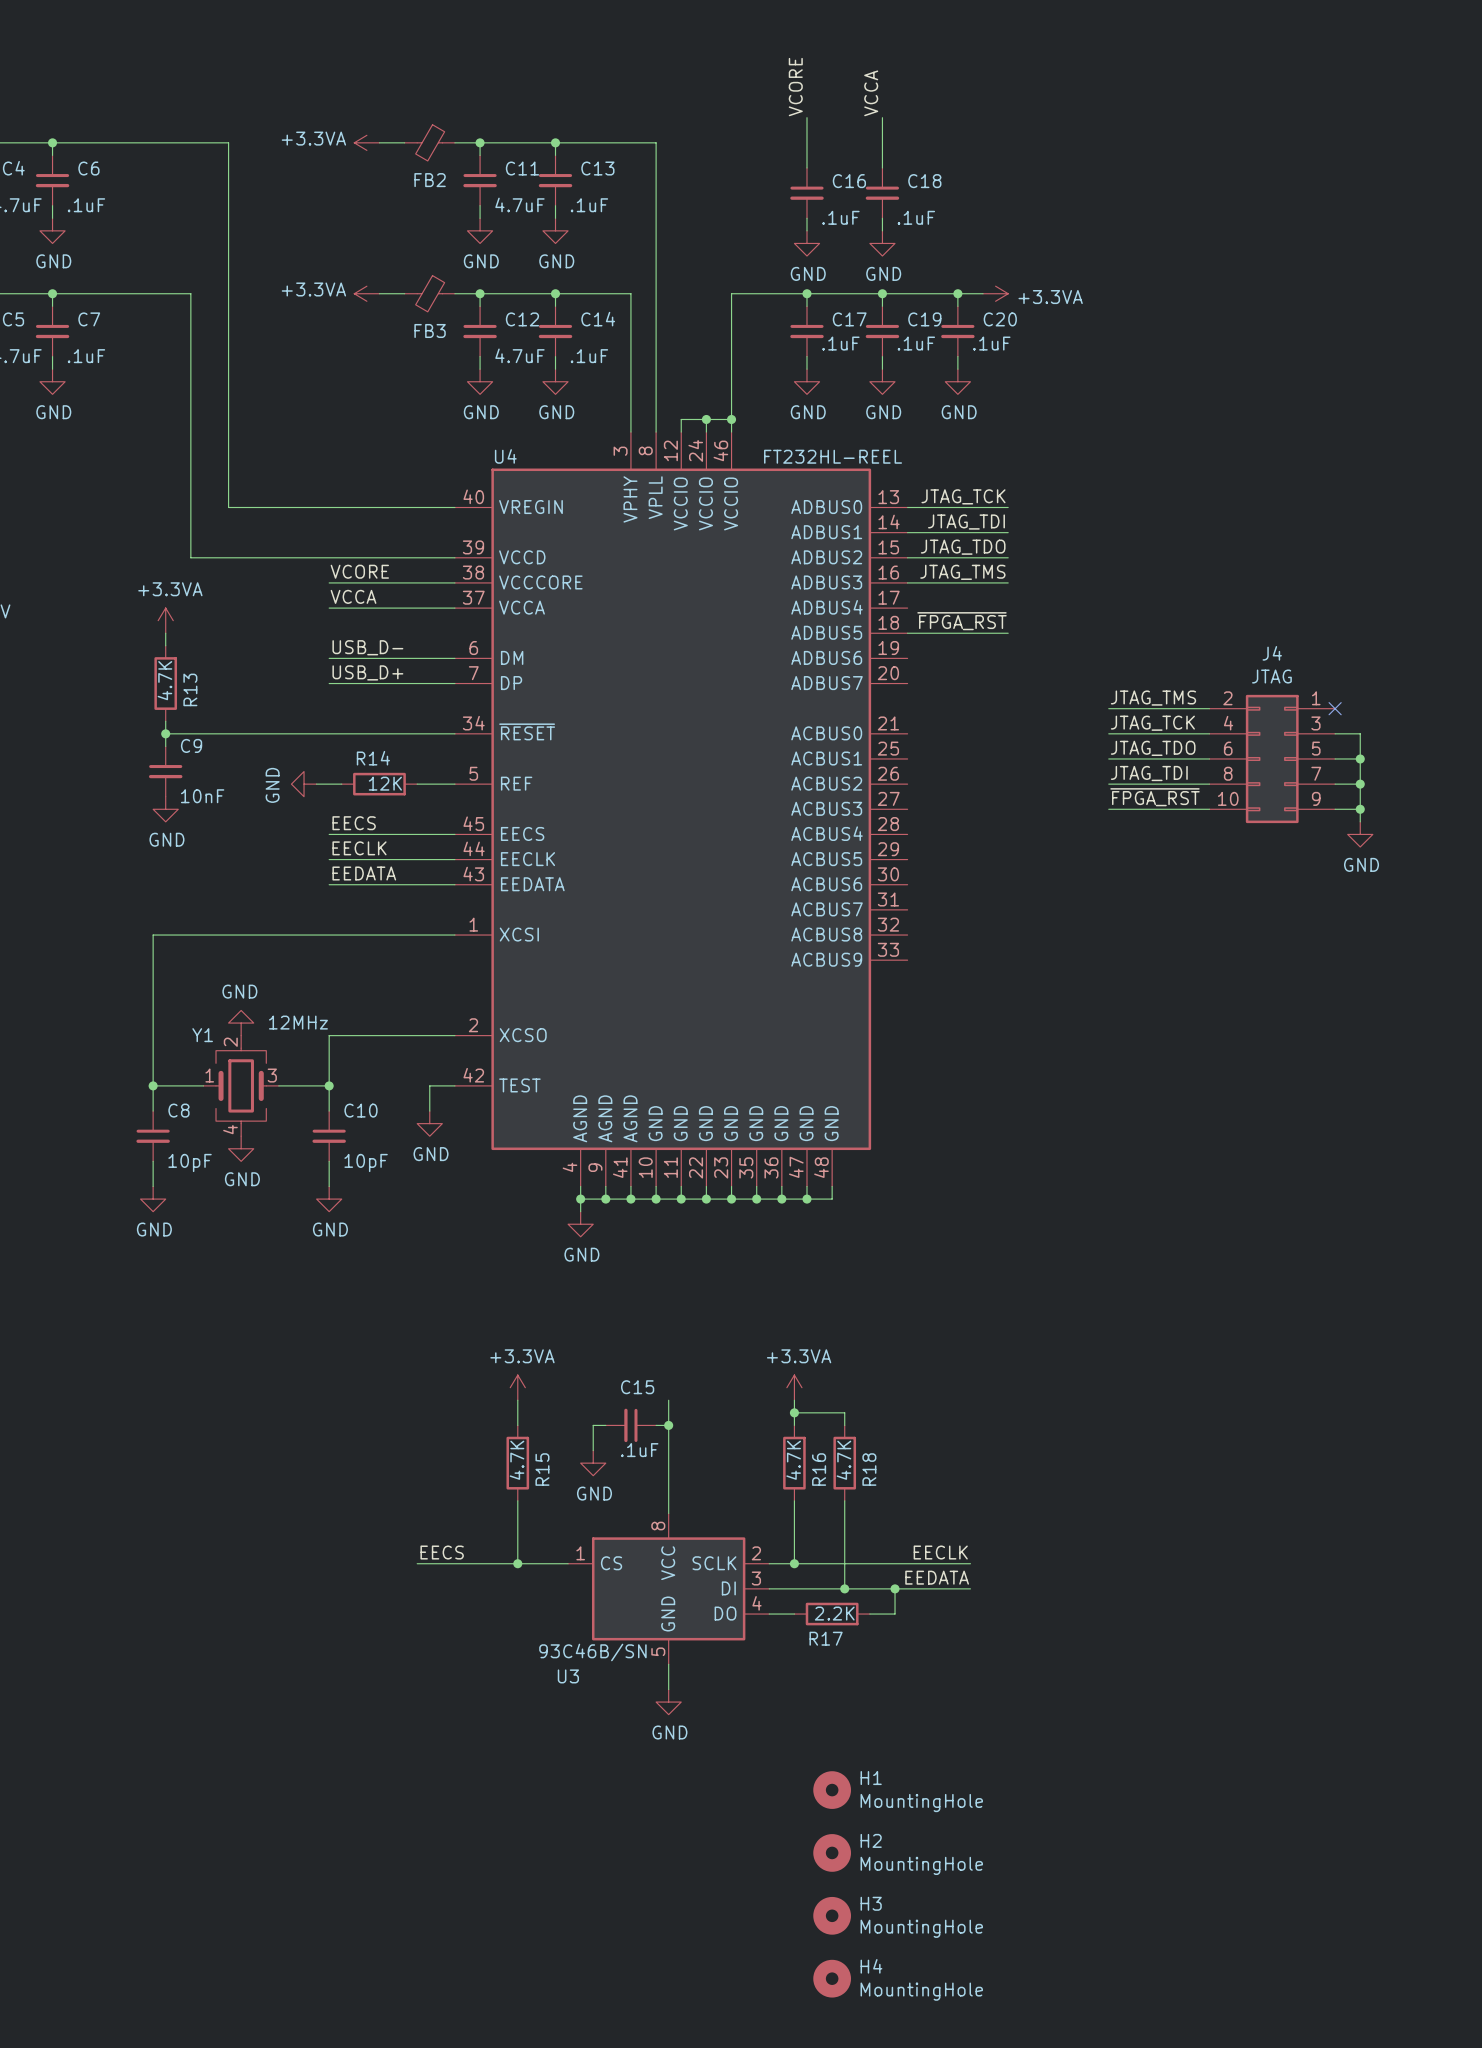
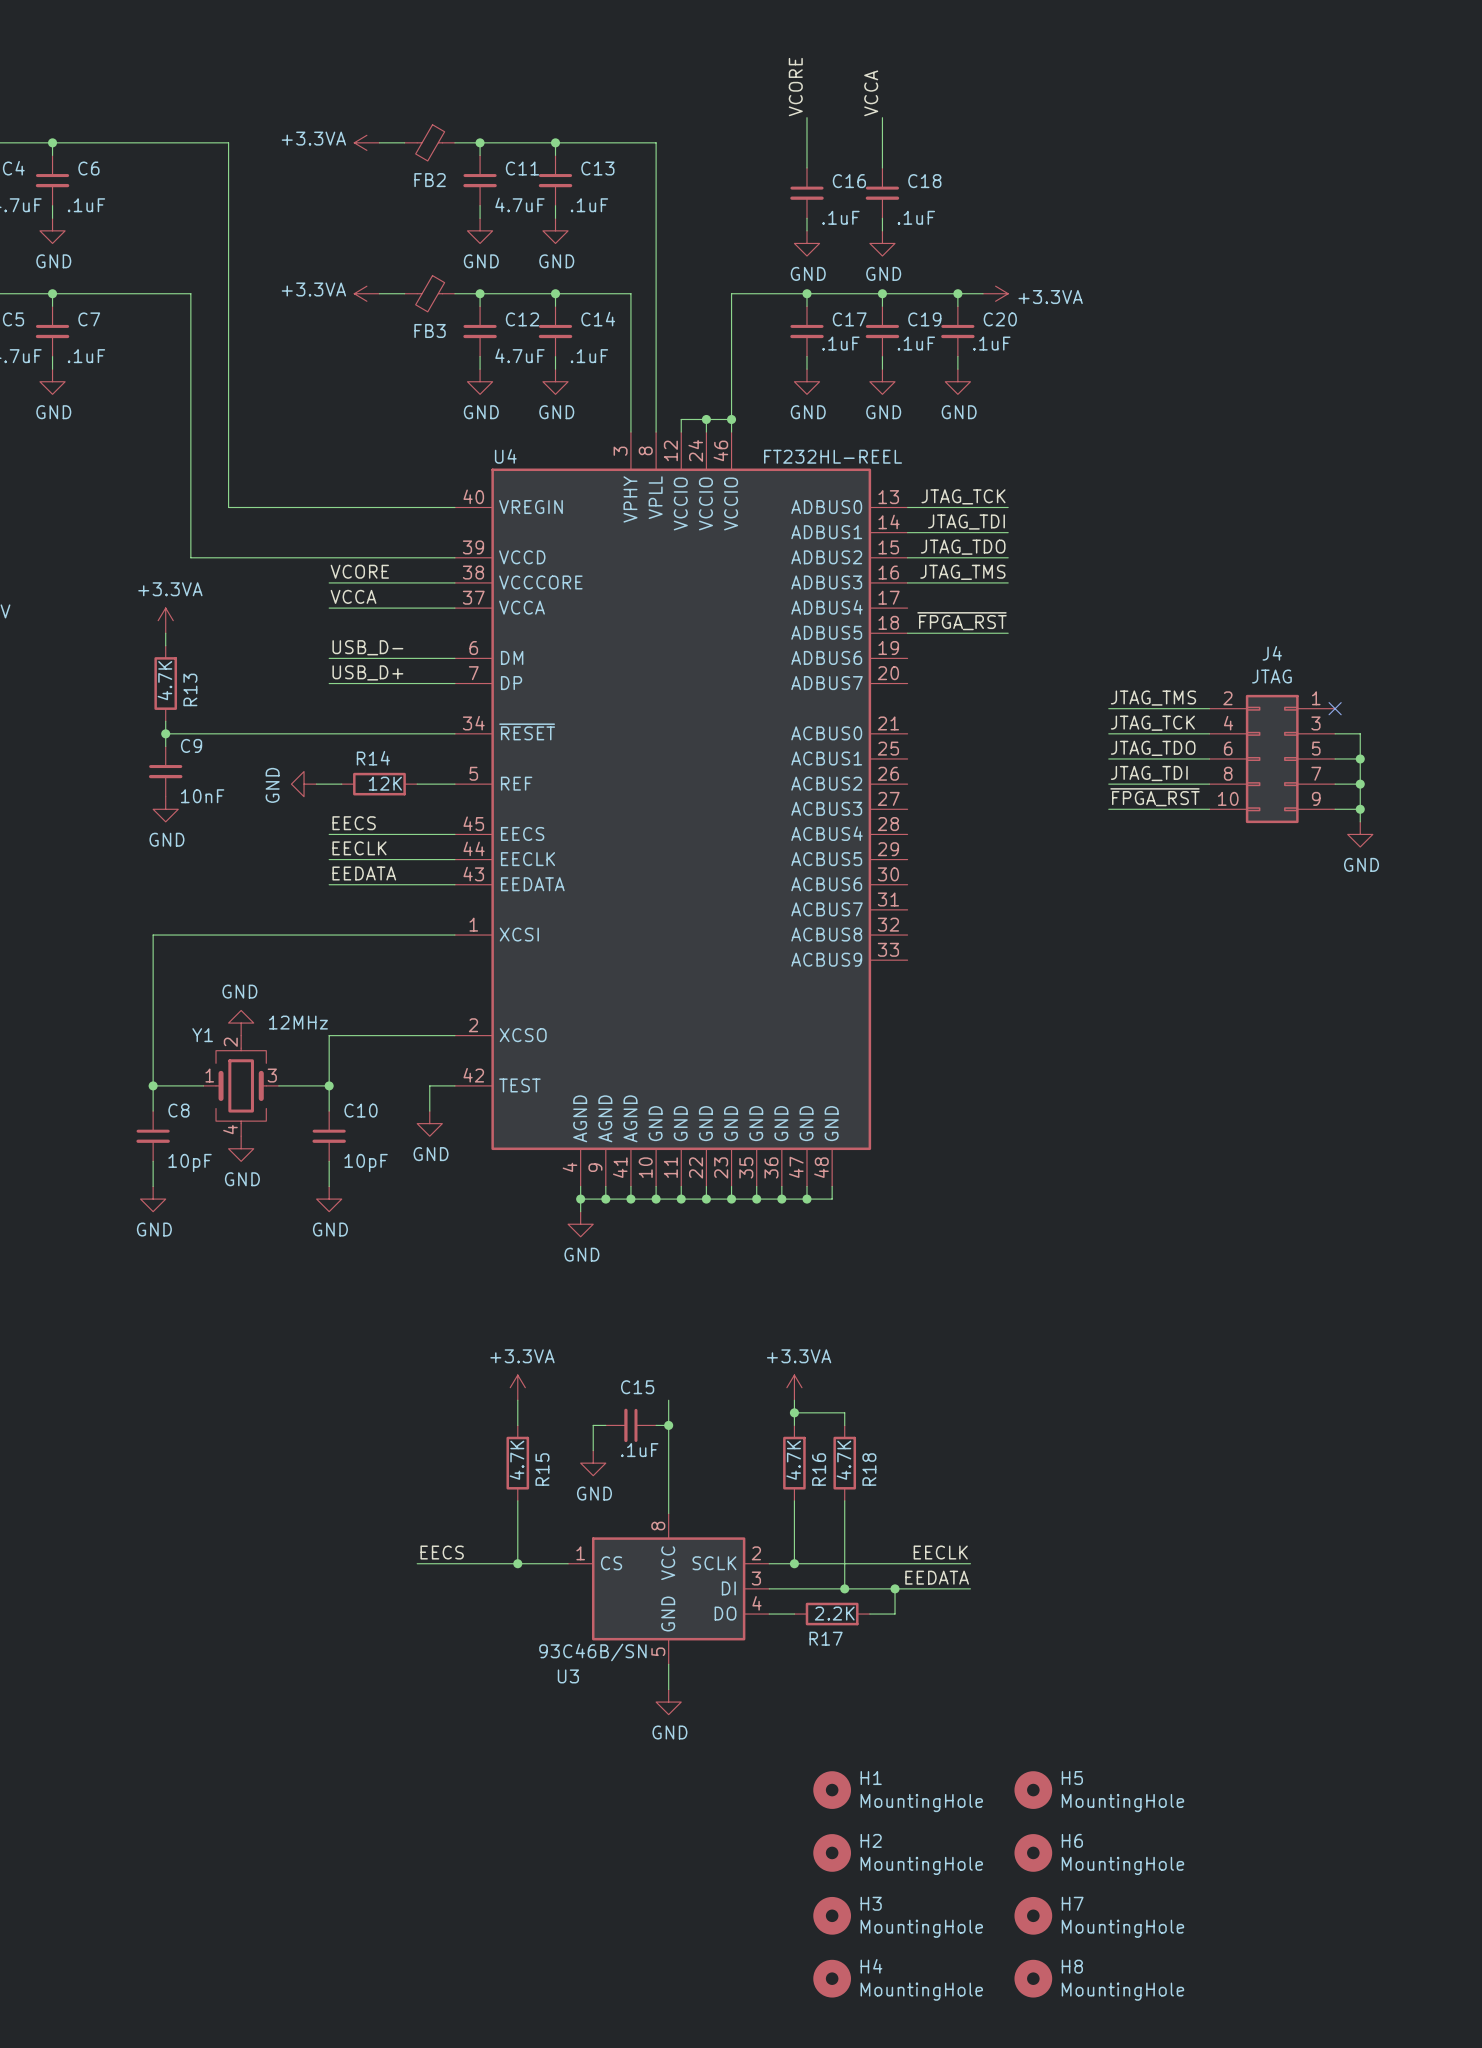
H5: none -> MountingHole (1033, 1790)
H6: none -> MountingHole (1033, 1852)
H7: none -> MountingHole (1033, 1915)
H8: none -> MountingHole (1033, 1978)

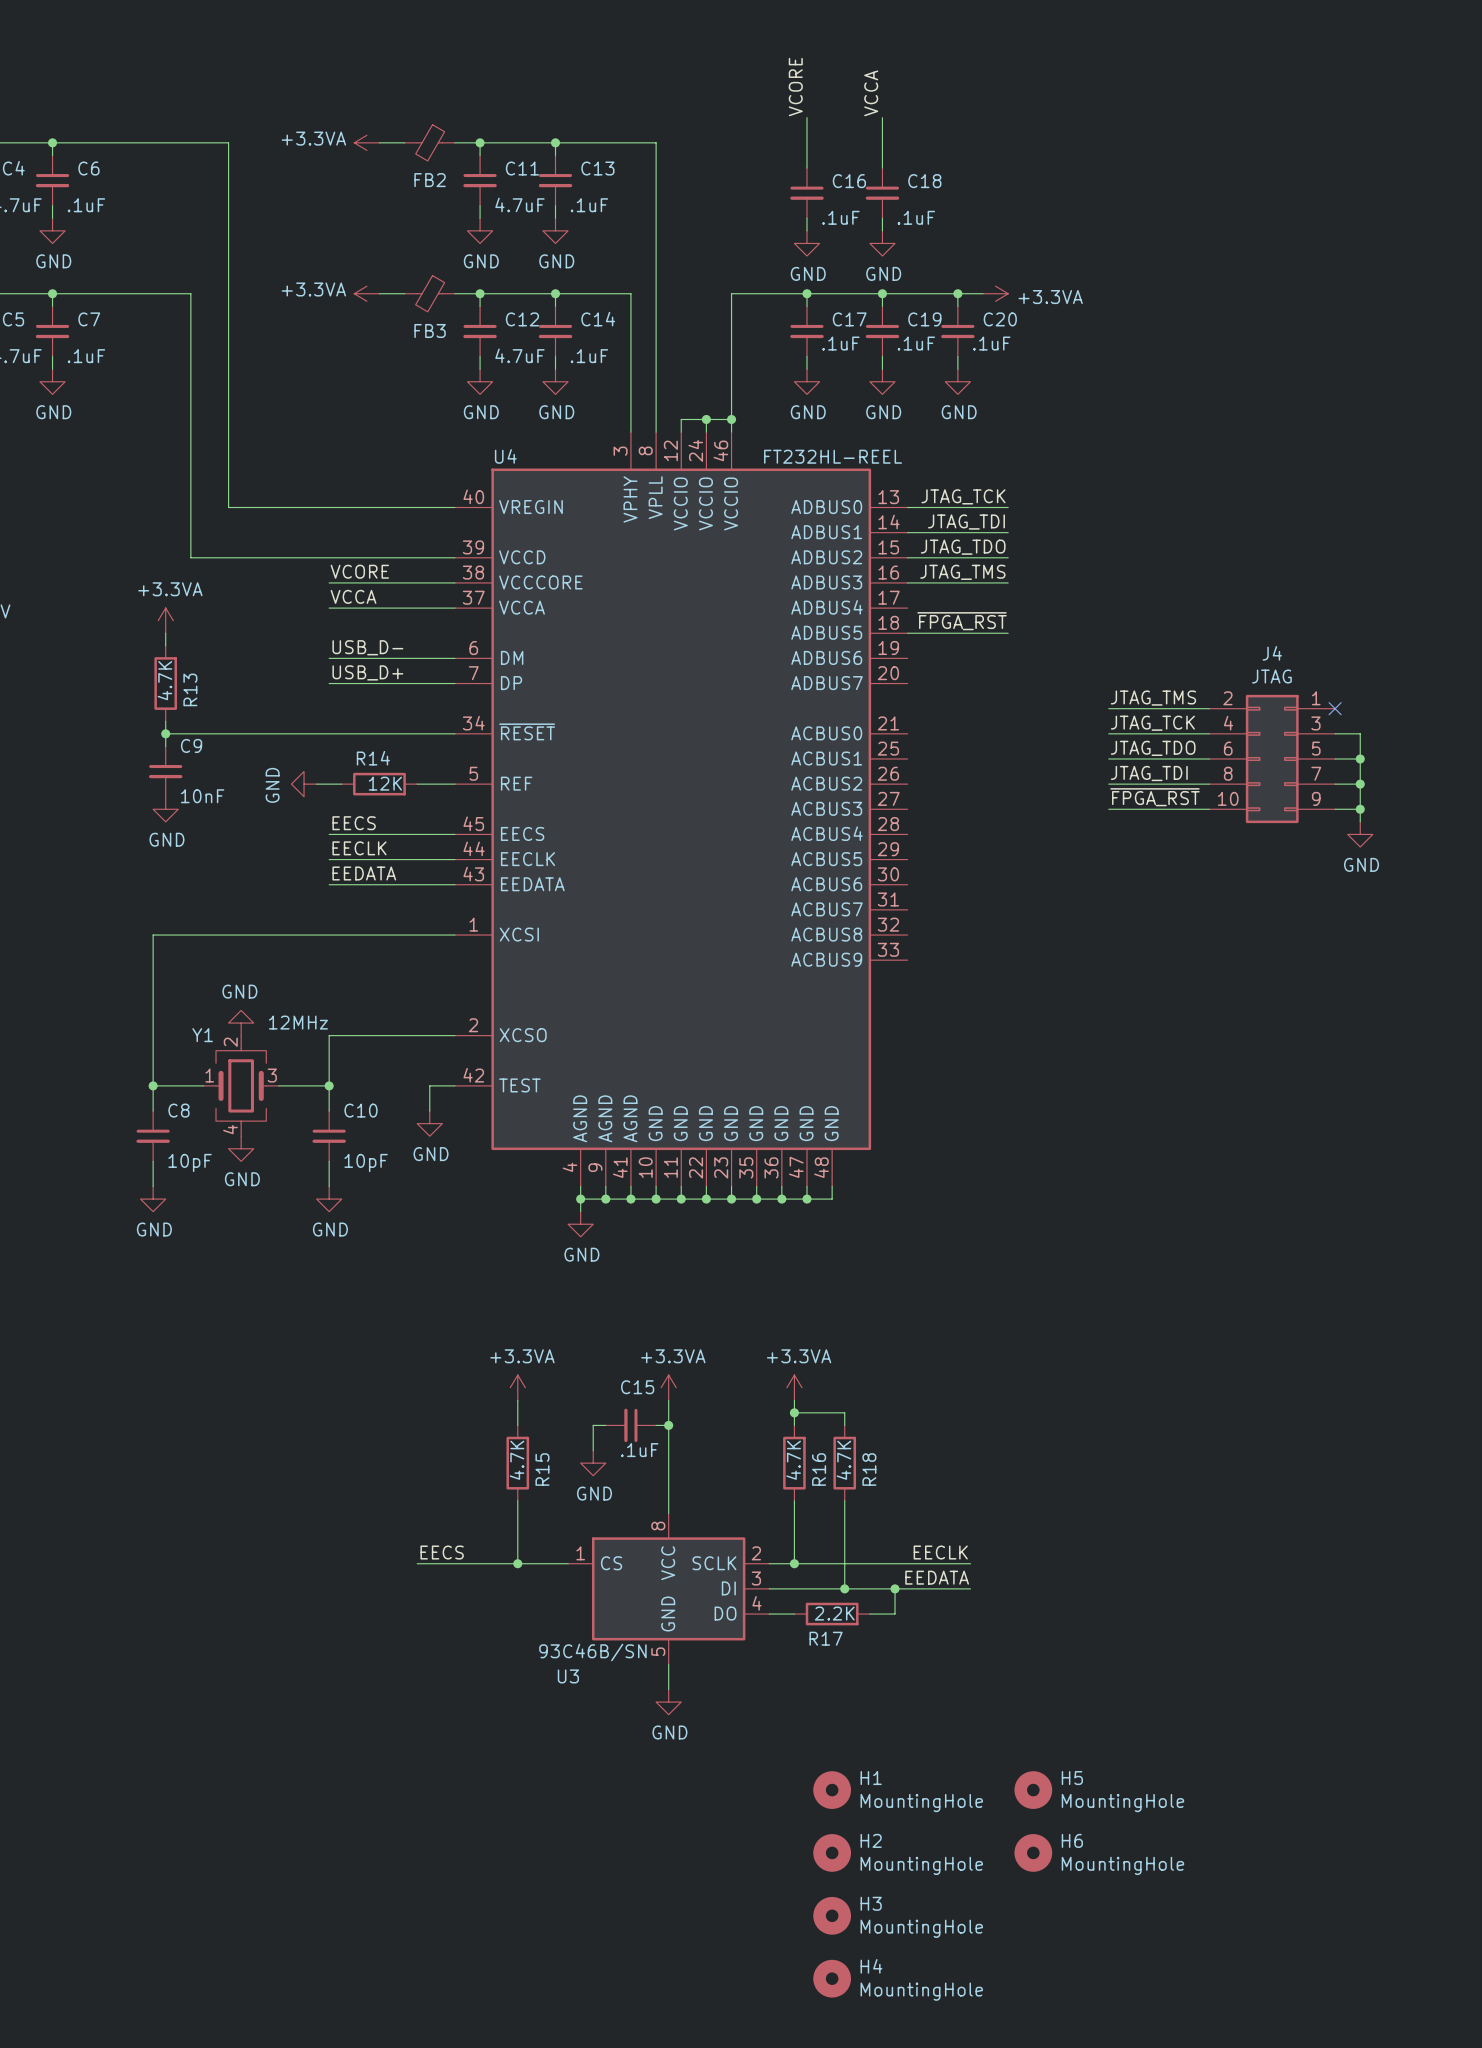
power symbol: none -> +3.3VA (668, 1387)
H7: MountingHole (1033, 1915) -> none
H8: MountingHole (1033, 1978) -> none

